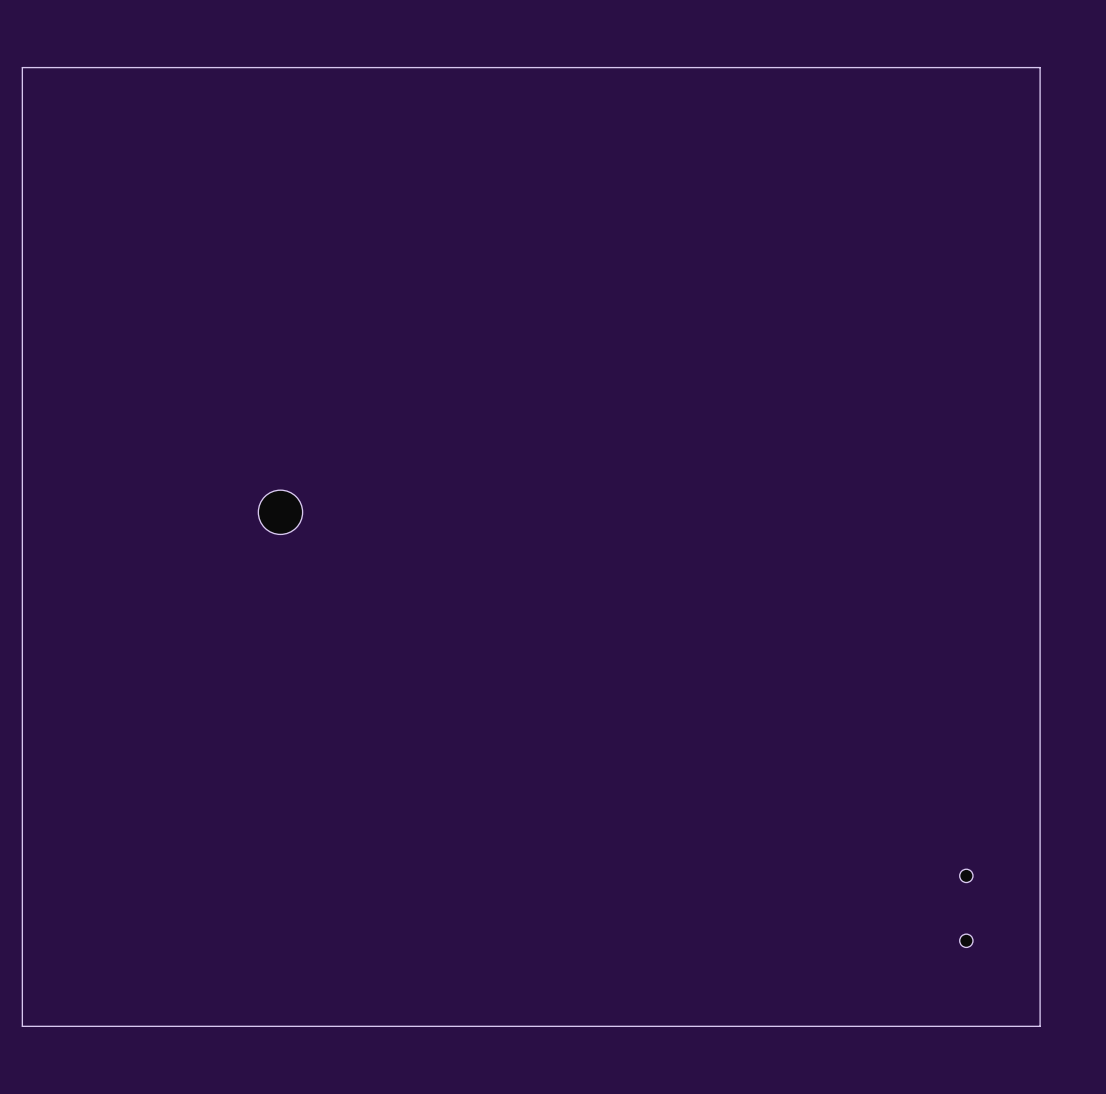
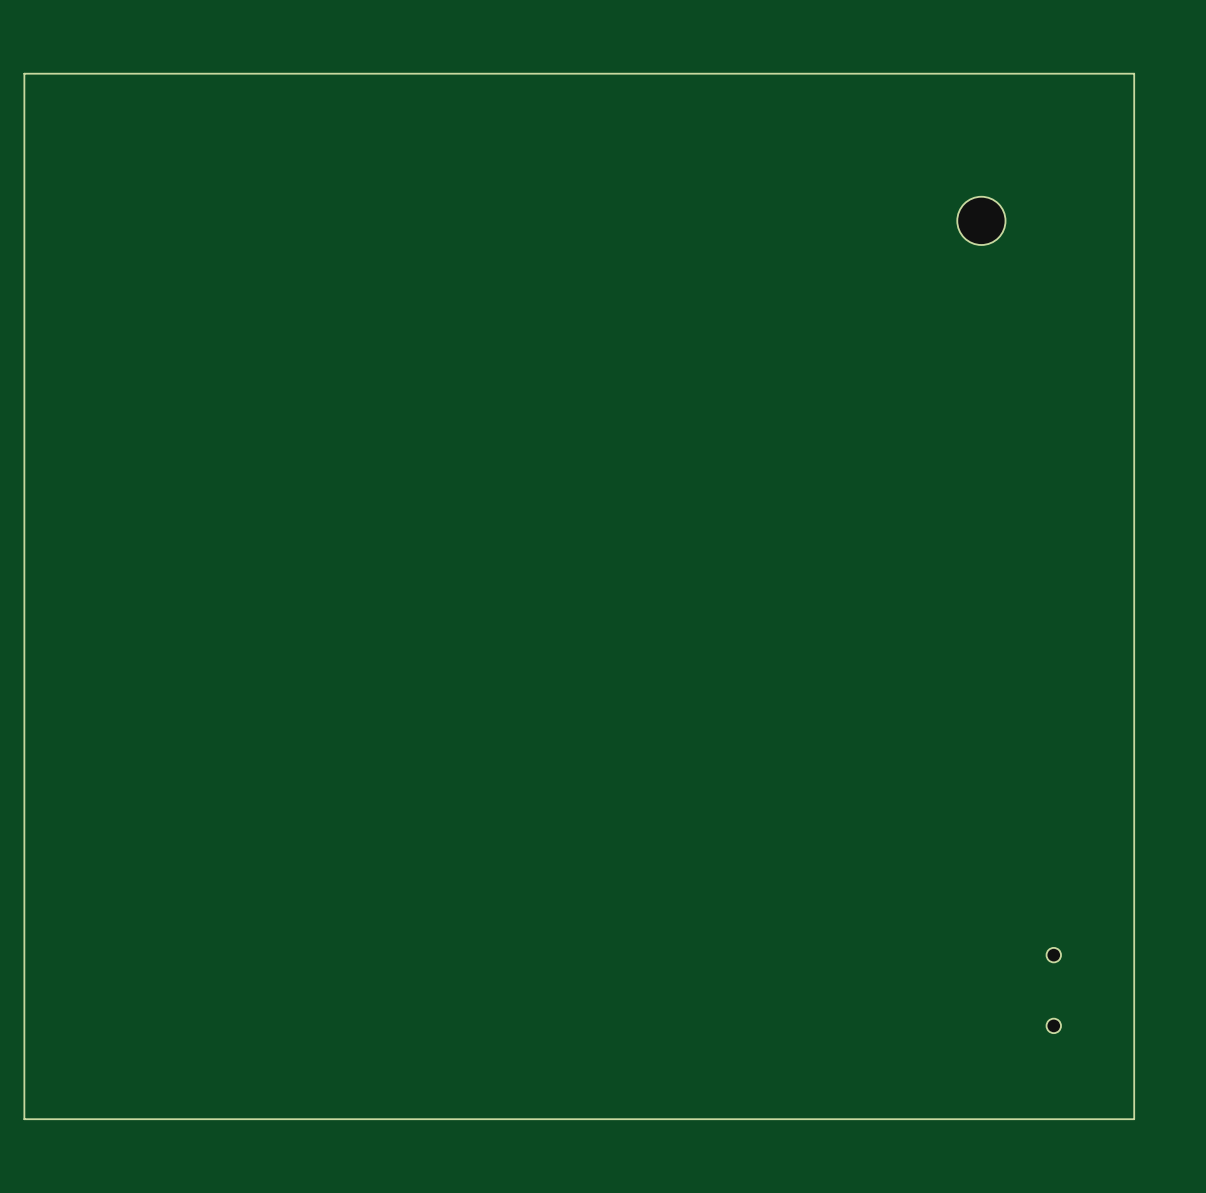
part: none -> (981, 220)
part: (280, 512) -> none

